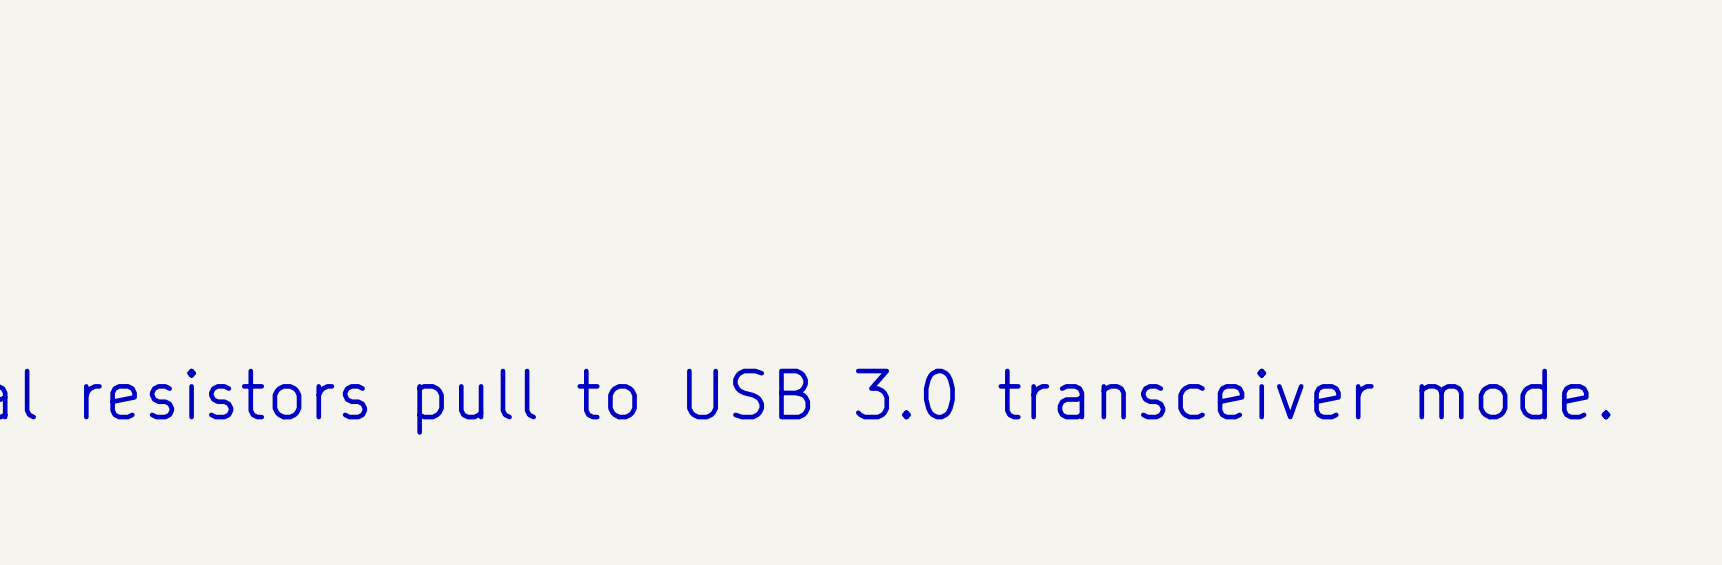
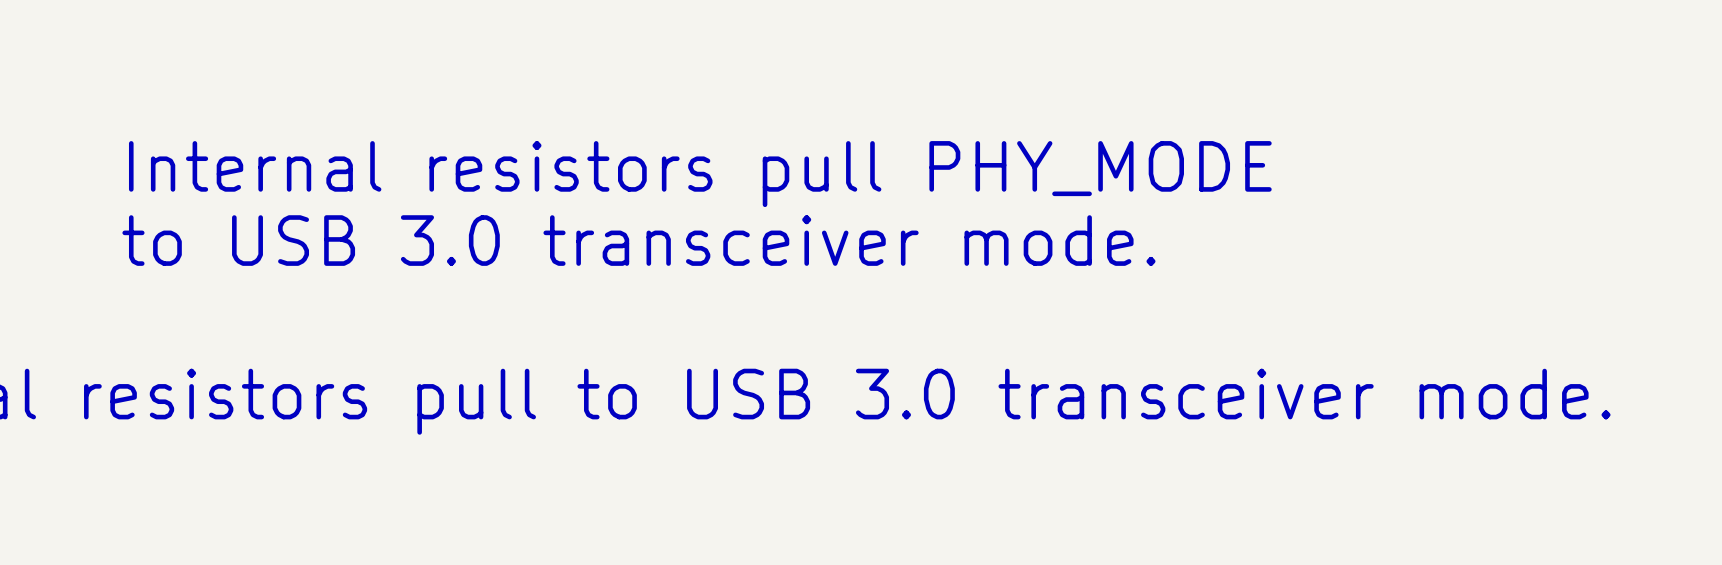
text: none -> Internal resistors pull PHY_MODE (700, 174)
text: none -> to USB 3.0 transceiver mode. (638, 240)

